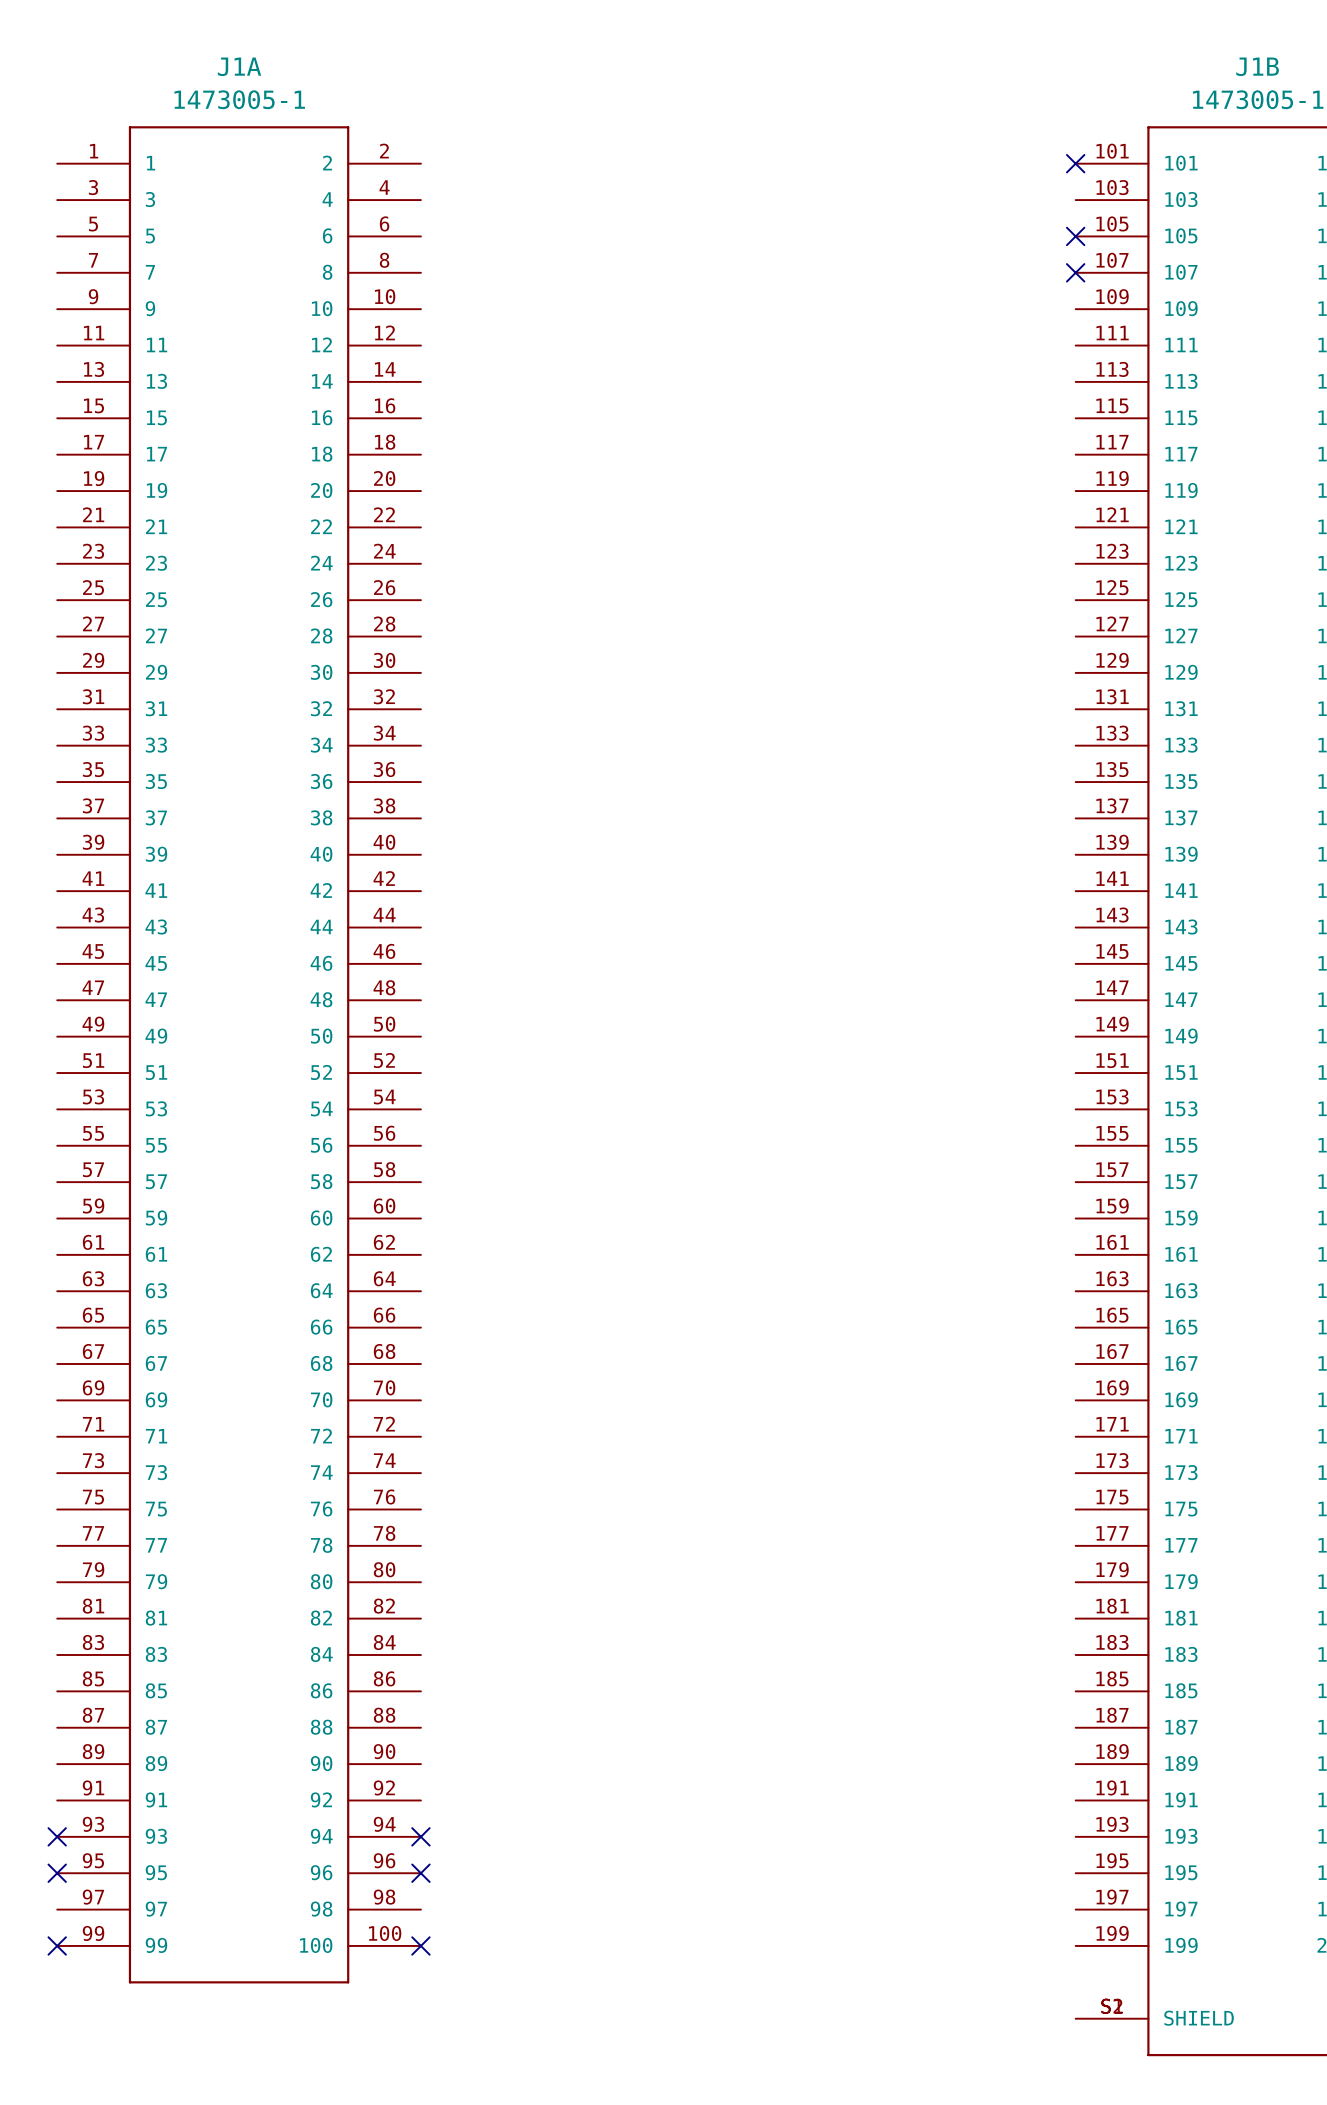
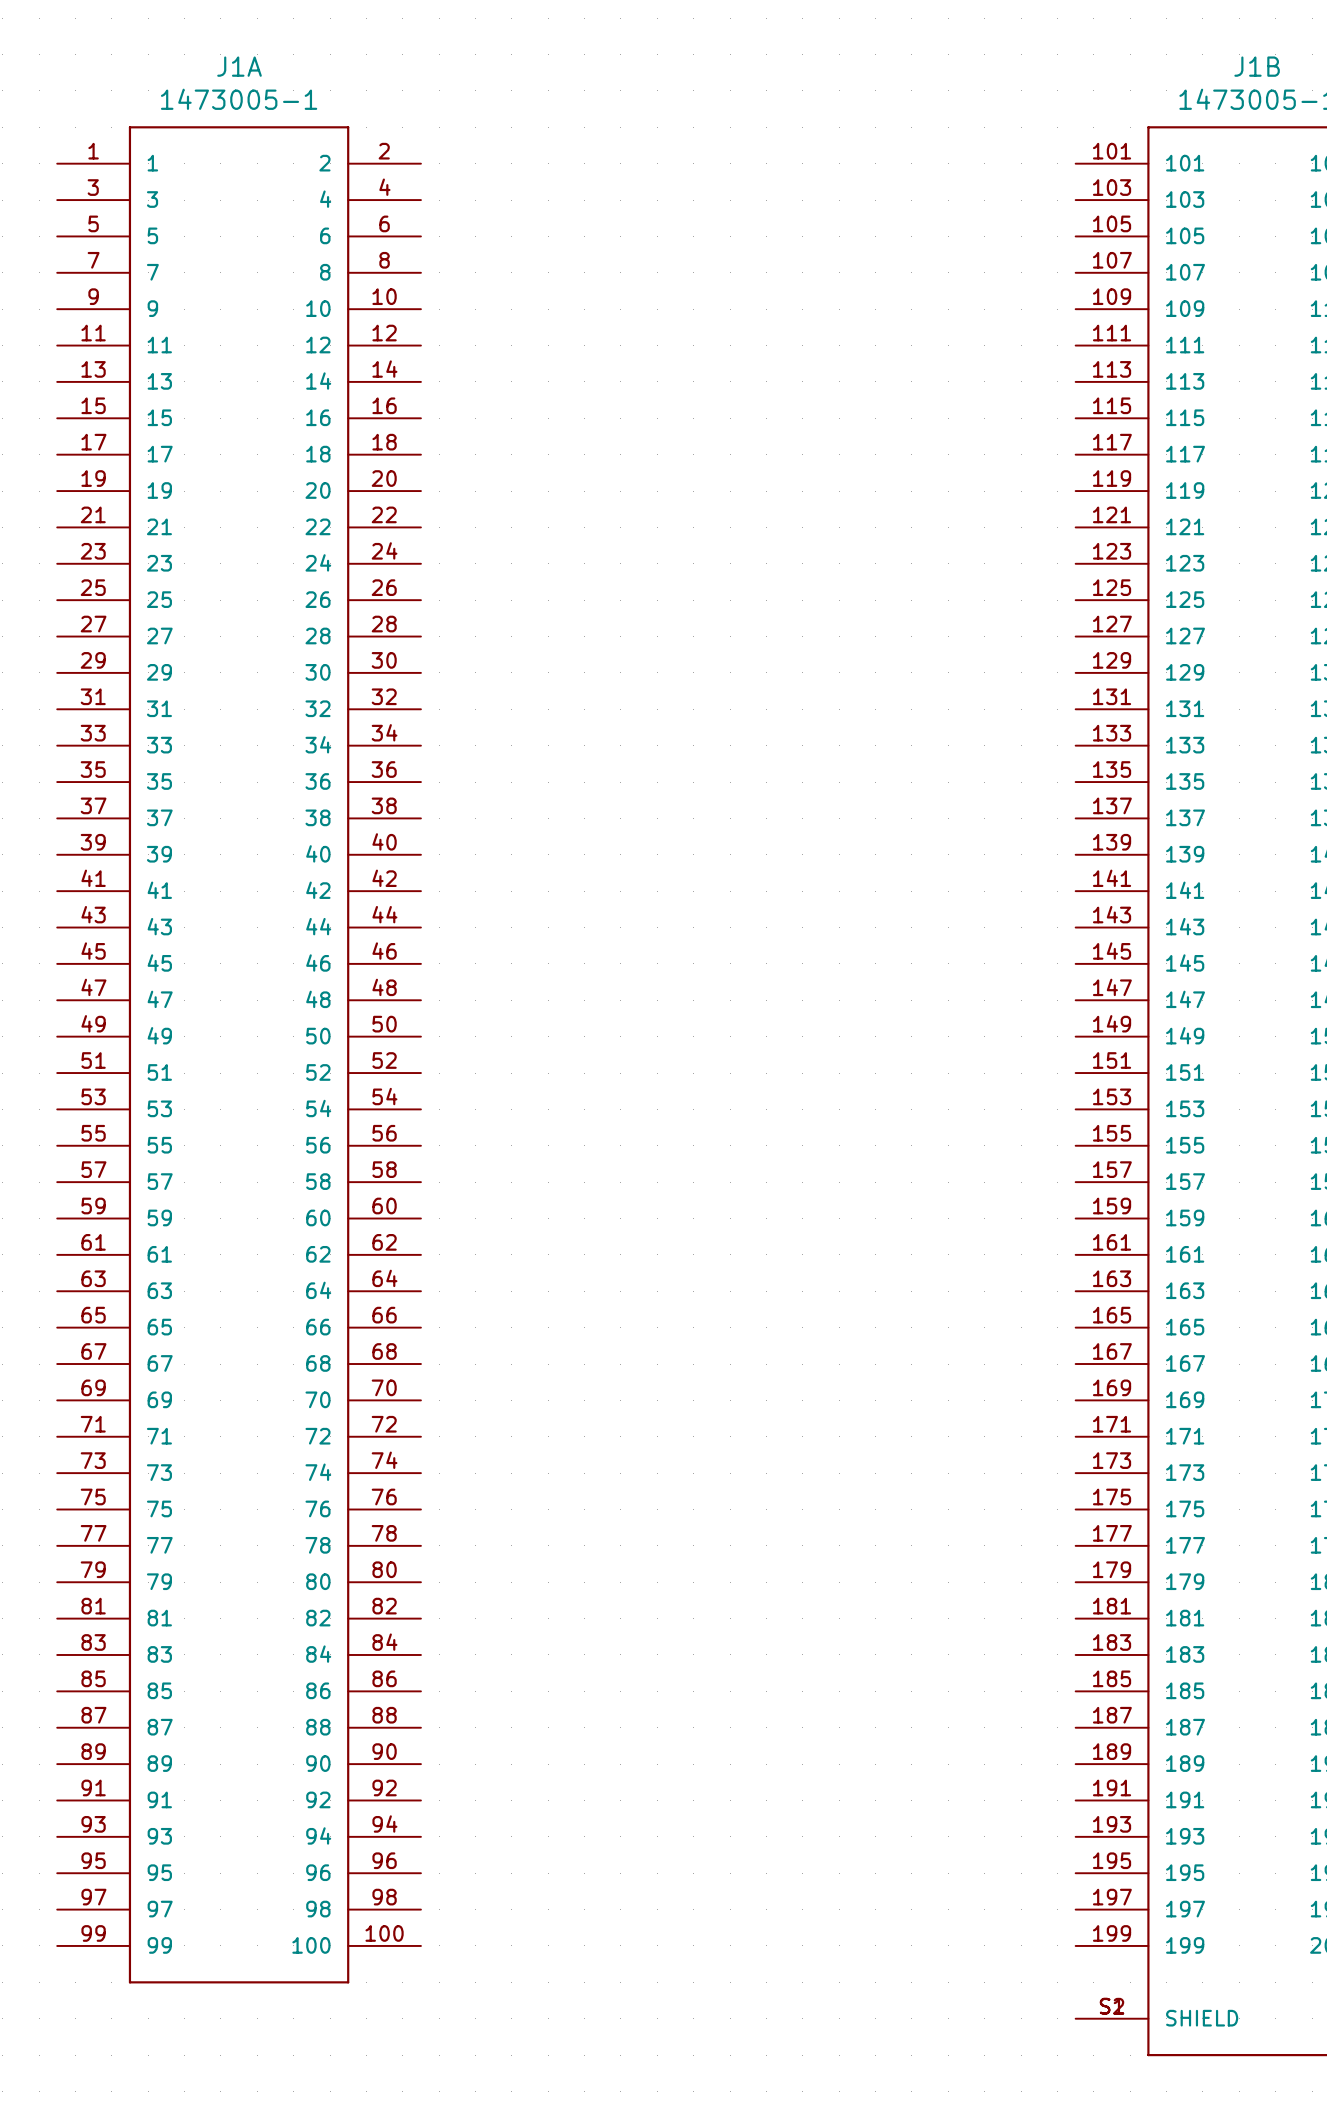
no-connect mark: (1075, 163) -> none
no-connect mark: (1075, 236) -> none
no-connect mark: (1075, 272) -> none
no-connect mark: (57, 1836) -> none
no-connect mark: (420, 1836) -> none
no-connect mark: (57, 1873) -> none
no-connect mark: (420, 1873) -> none
no-connect mark: (57, 1945) -> none
no-connect mark: (420, 1945) -> none

